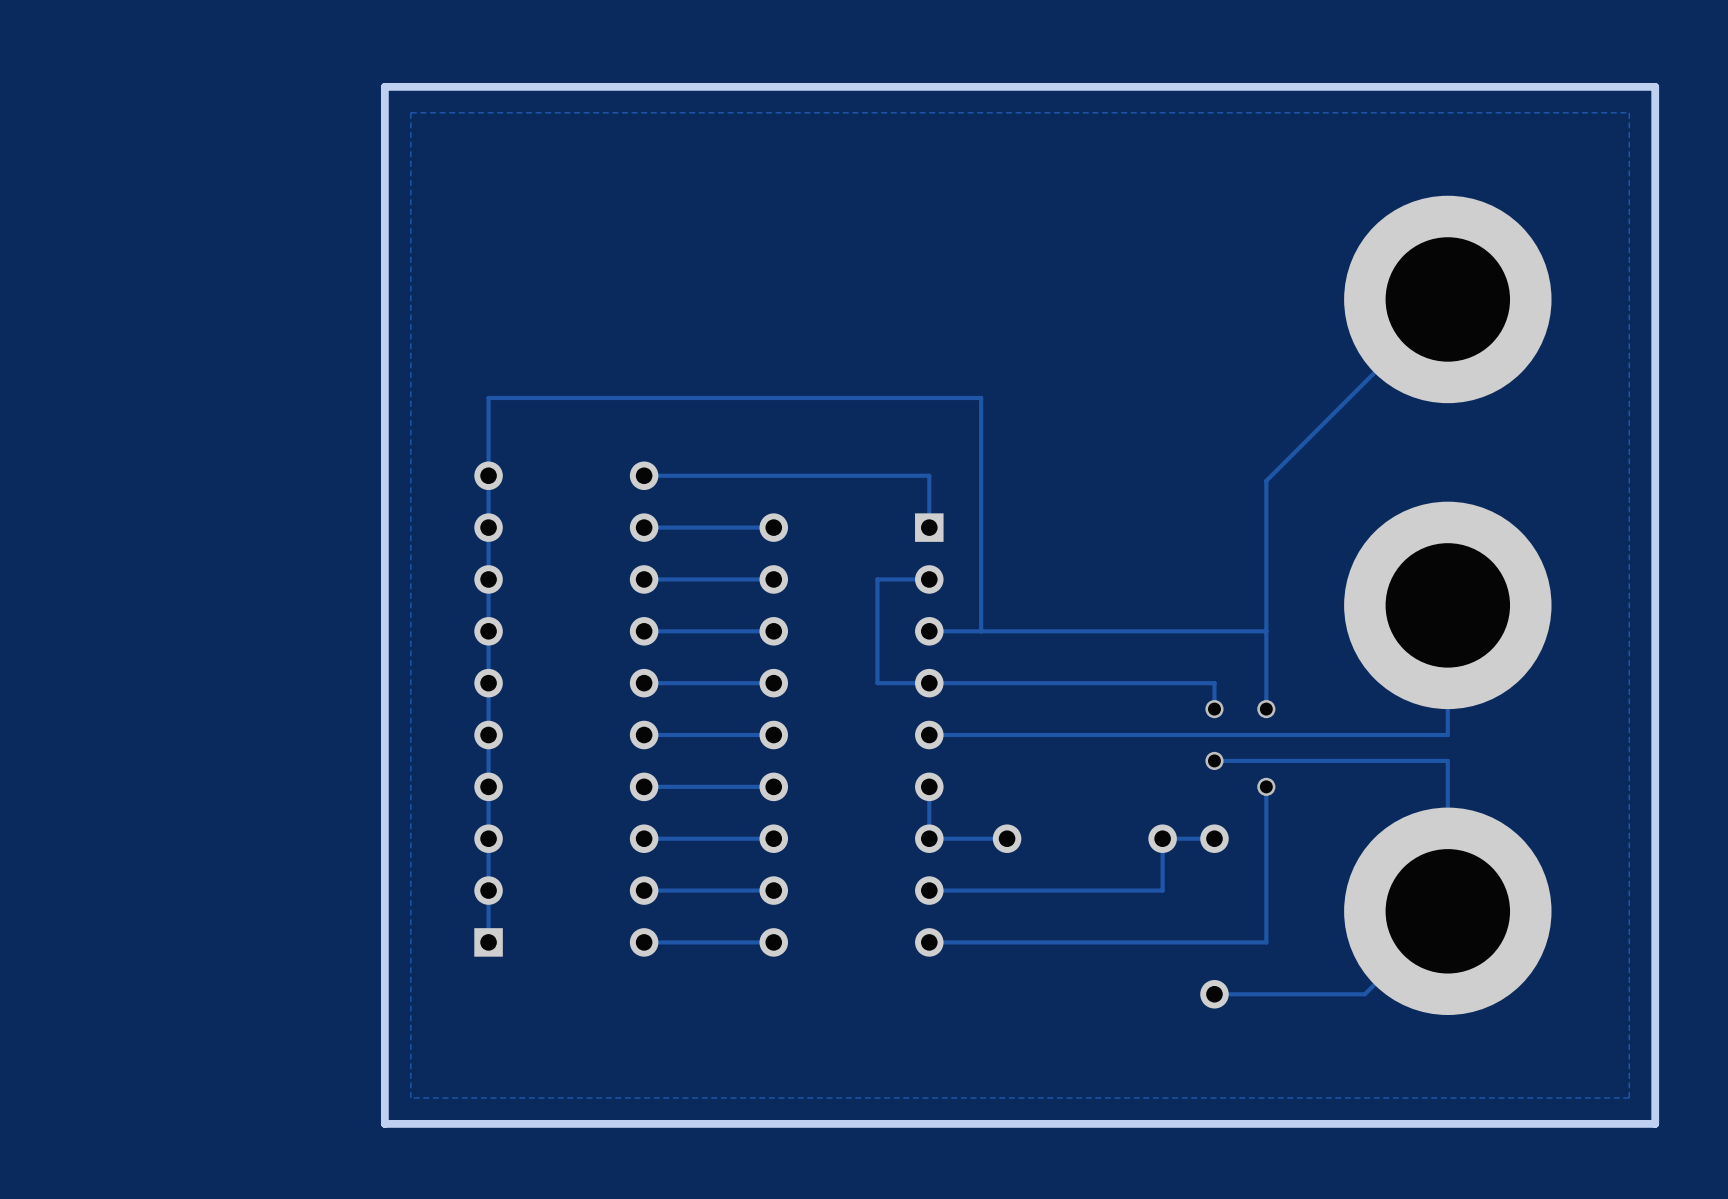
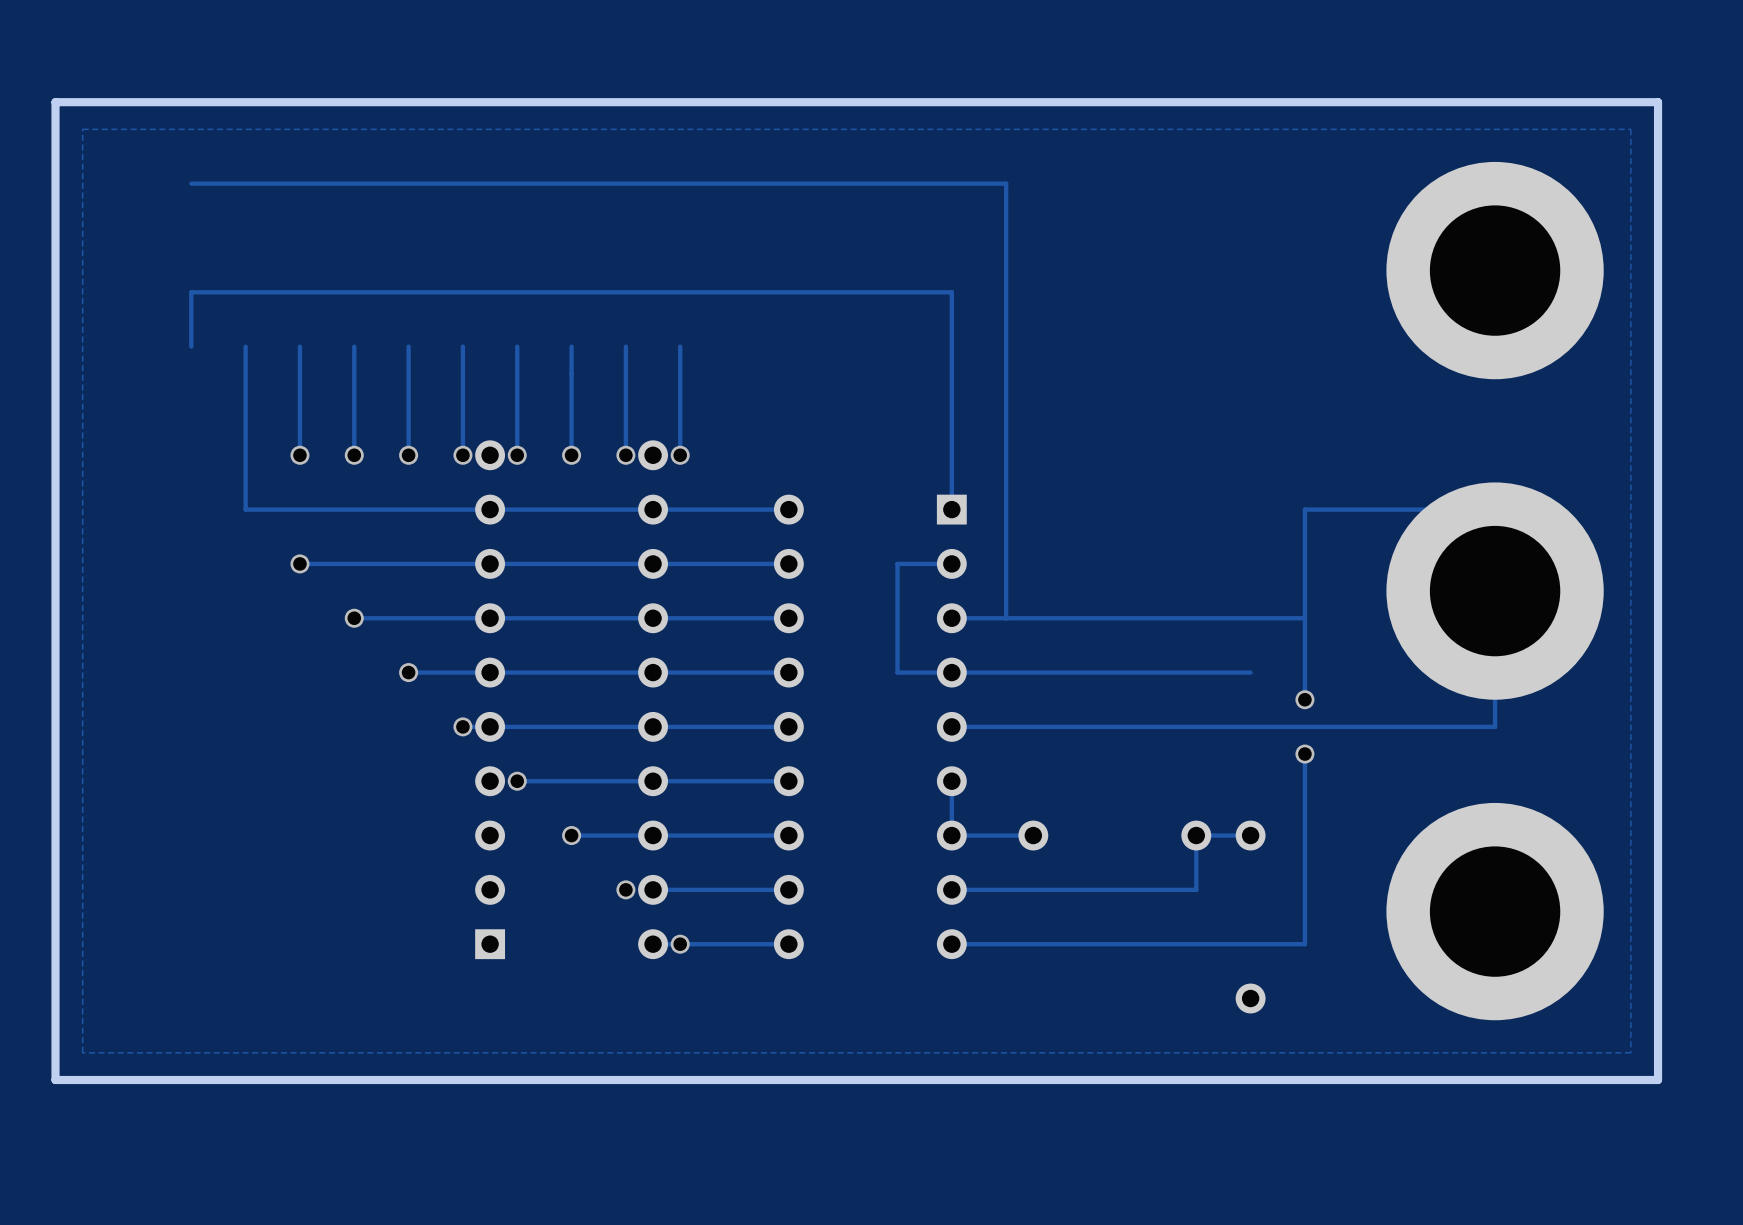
board edge: (1655, 86) (1655, 1123) (384, 1123) (384, 86) (1655, 86) -> (1658, 102) (1658, 1079) (55, 1079) (55, 102) (1658, 102)
zone outline: (1629, 112) (410, 112) (410, 1097) (1629, 1097) (1629, 112) -> (1630, 129) (1630, 1052) (82, 1052) (82, 129) (1630, 129)
track: (1447, 299) (1266, 480) (1266, 527) -> (1440, 509) (1304, 509)
track: none -> (245, 346) (245, 509) (653, 509)
track: none -> (299, 346) (299, 455)
track: none -> (354, 346) (354, 455)
track: none -> (408, 346) (408, 455)
track: none -> (462, 346) (462, 455)
track: none -> (517, 346) (517, 455)
track: none -> (571, 346) (571, 455)
track: none -> (625, 346) (625, 455)
track: none -> (680, 346) (680, 455)
track: (981, 397) (488, 397) (488, 942) -> (1006, 373) (1006, 183) (191, 183)
via: none -> (299, 455)
via: none -> (354, 455)
via: none -> (408, 455)
via: none -> (462, 455)
via: none -> (517, 455)
via: none -> (571, 455)
via: none -> (625, 455)
via: none -> (680, 455)
track: (929, 475) (644, 475) -> (951, 455) (951, 292) (191, 292) (191, 346)
via: none -> (299, 563)
track: none -> (653, 563) (299, 563)
via: none -> (354, 618)
track: none -> (653, 618) (354, 618)
via: none -> (408, 672)
track: none -> (653, 672) (408, 672)
track: (1214, 683) (1214, 709) -> (1304, 754) (1304, 781)
via: (1214, 709) -> none
via: none -> (462, 726)
track: none -> (653, 726) (462, 726)
track: (1214, 760) (1447, 760) (1447, 911) (1364, 994) (1214, 994) -> none
via: (1214, 760) -> none
via: none -> (1304, 754)
via: none -> (517, 781)
track: none -> (653, 781) (517, 781)
via: (1266, 786) -> none
via: none -> (571, 835)
track: none -> (653, 835) (571, 835)
via: none -> (625, 889)
via: none -> (680, 944)

